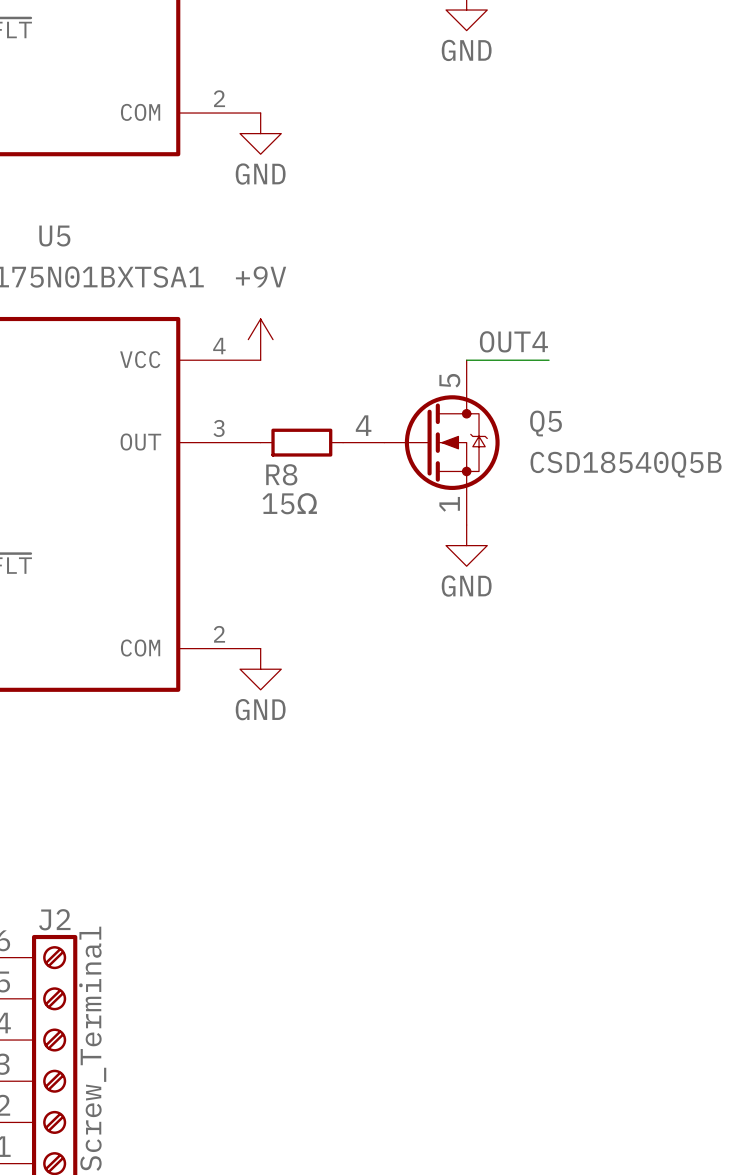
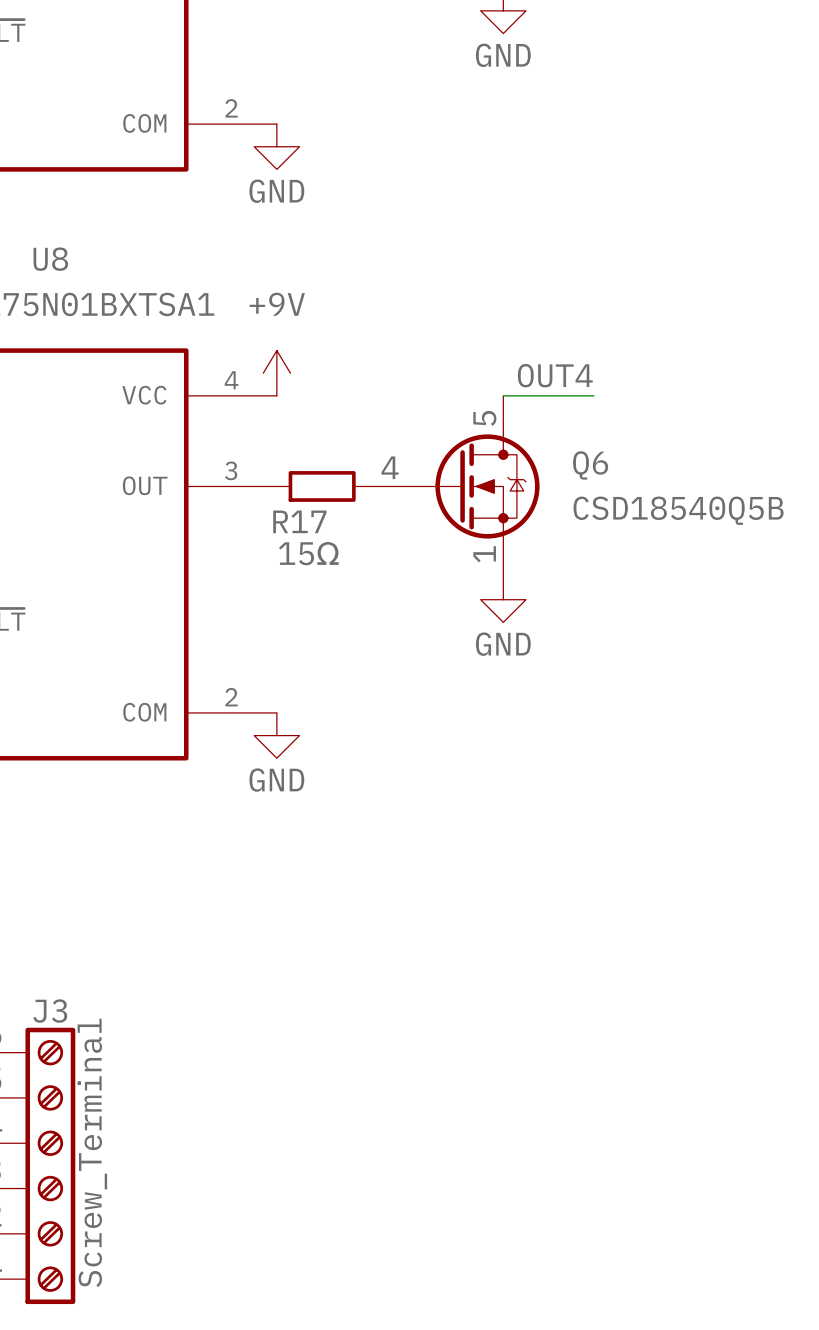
U5 name: U5 (54, 236) -> U8 (50, 259)
Q5 name: Q5 (546, 423) -> Q6 (590, 465)
R8 name: R8 (281, 474) -> R17 (299, 521)
J2 name: J2 (54, 919) -> J3 (50, 1011)

